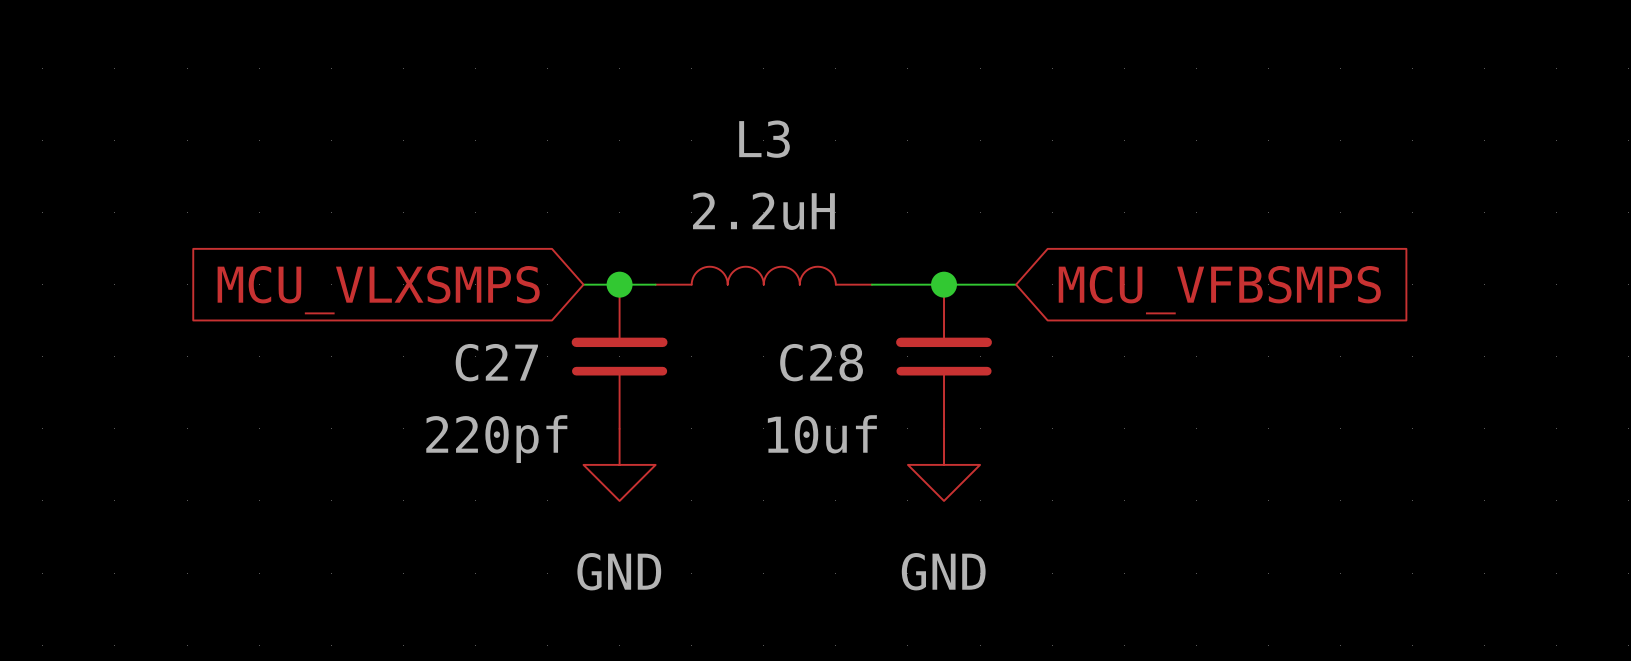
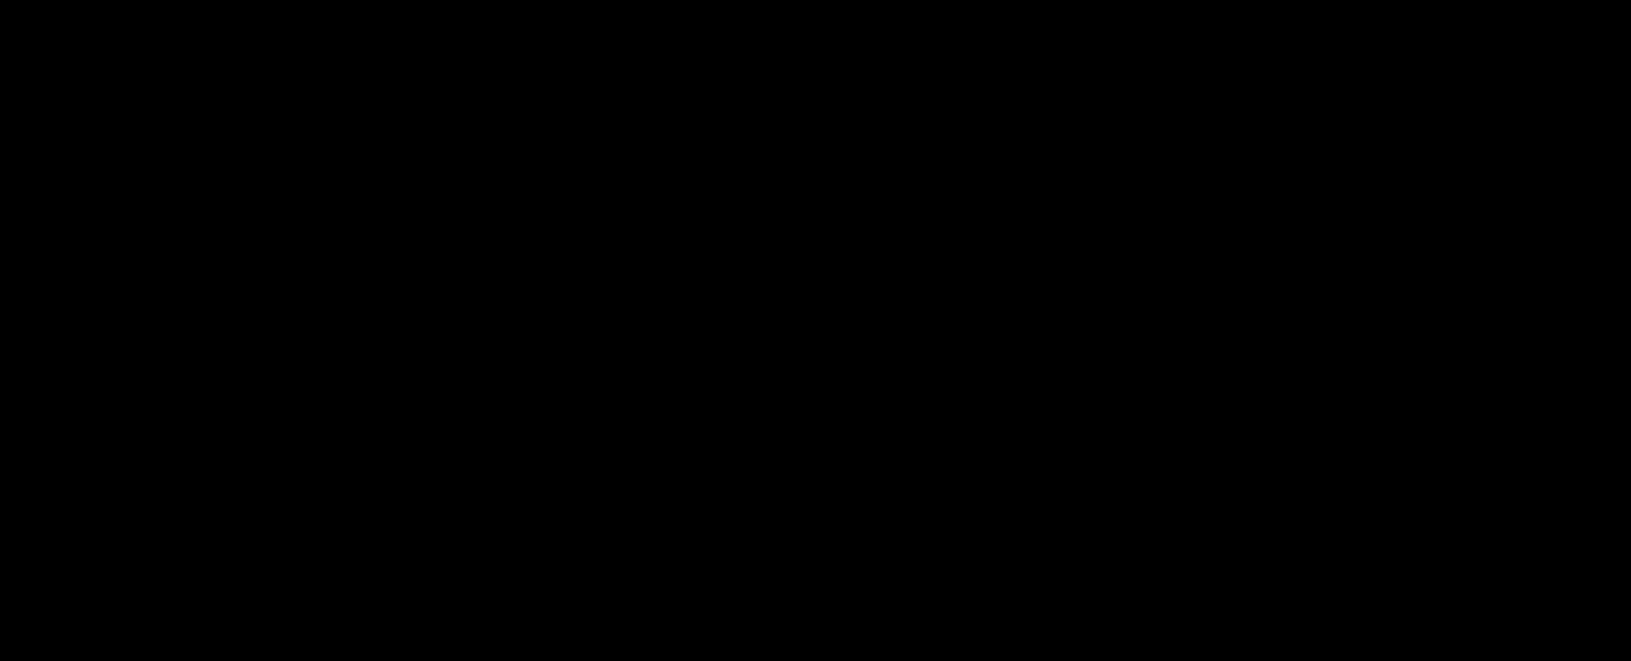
L3: 2.2uH (763, 275) -> none
wire: (583, 284) (655, 284) -> none
junction: (619, 284) -> none
wire: (871, 284) (1016, 284) -> none
junction: (944, 284) -> none
global label: MCU_VLXSMPS (378, 290) -> none
global label: MCU_VFBSMPS (1219, 290) -> none
C27: 220pf (619, 356) -> none
C28: 10uf (944, 356) -> none
power symbol: GND (619, 464) -> none
power symbol: GND (944, 464) -> none

